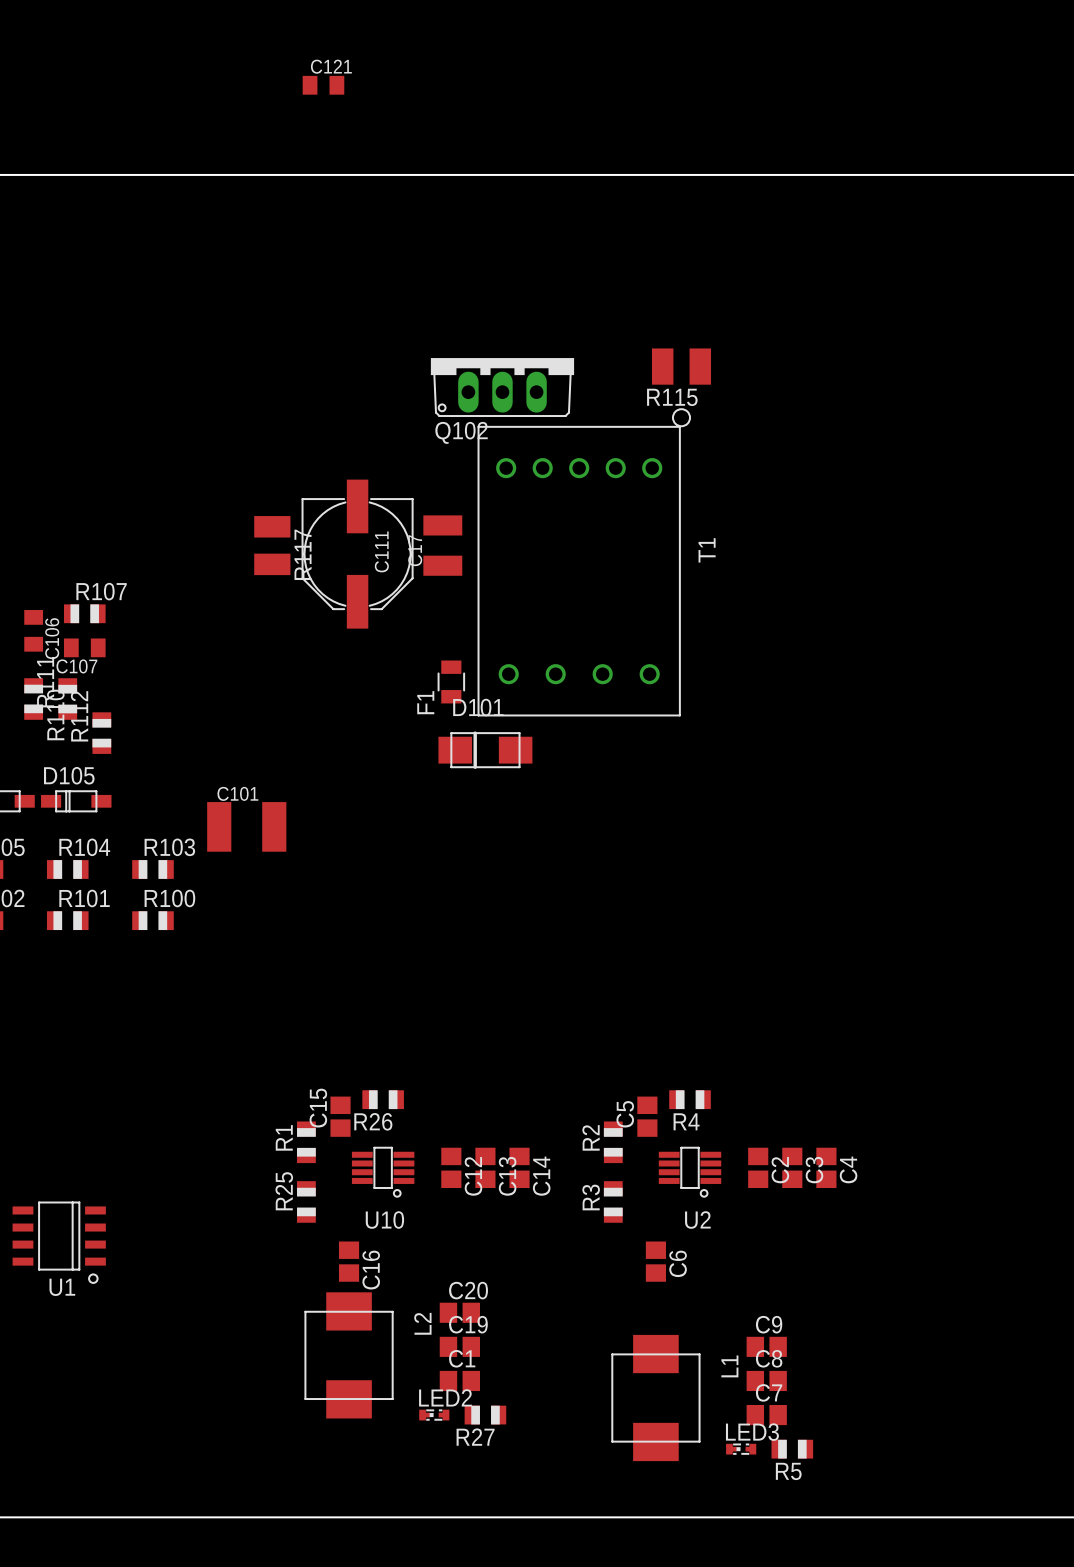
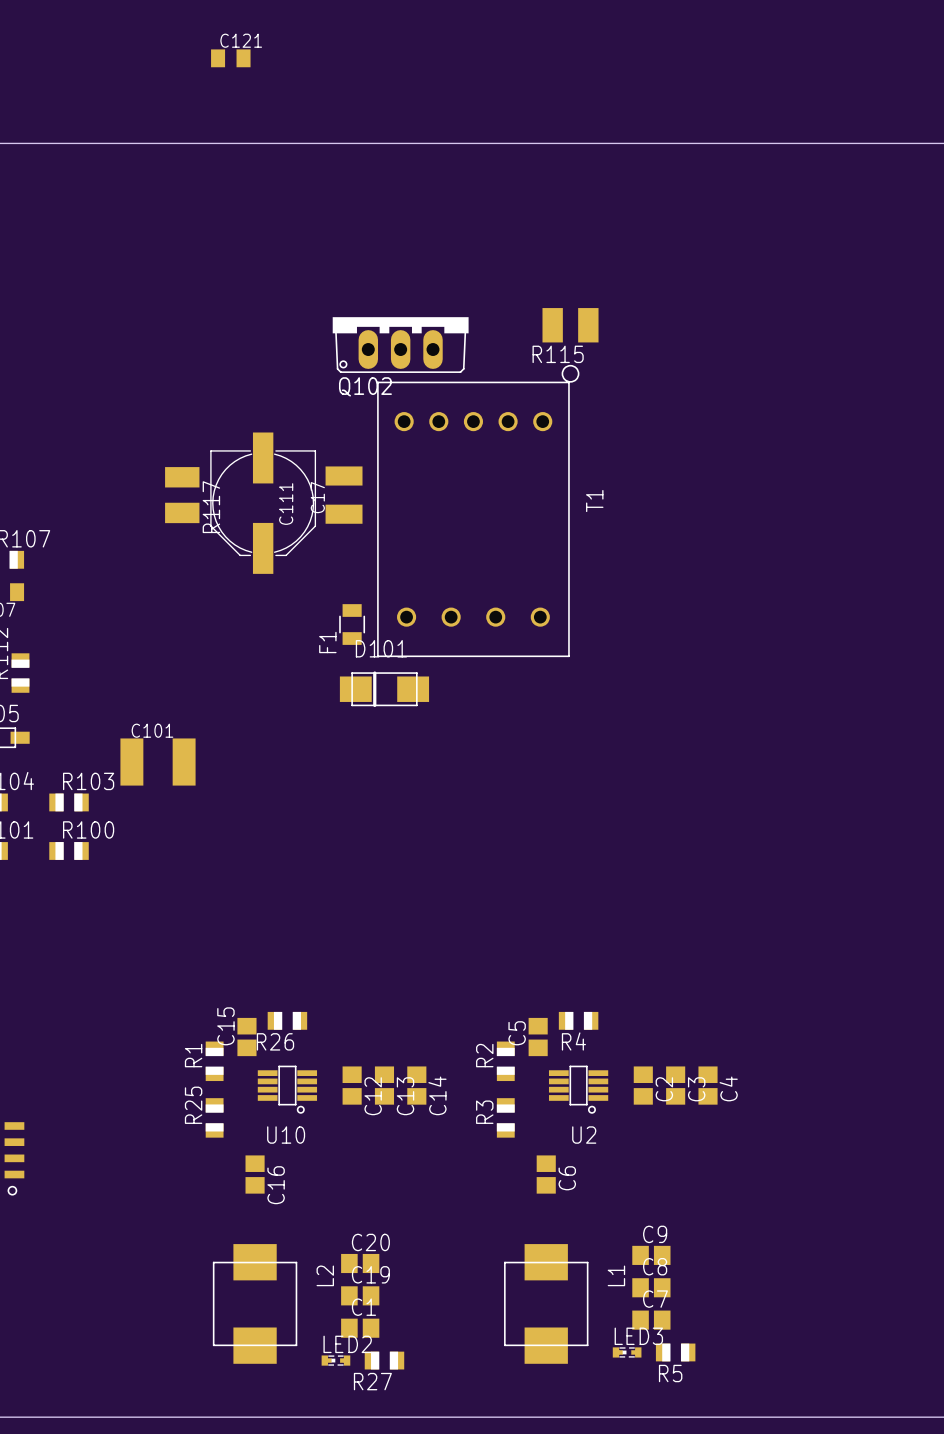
C20 position: (459, 1312) -> (360, 1263)
C19 position: (459, 1346) -> (360, 1295)
L2 position: (349, 1355) -> (255, 1303)
C1 position: (459, 1380) -> (360, 1328)
LED2 position: (434, 1415) -> (335, 1360)
R27 position: (485, 1415) -> (384, 1360)

